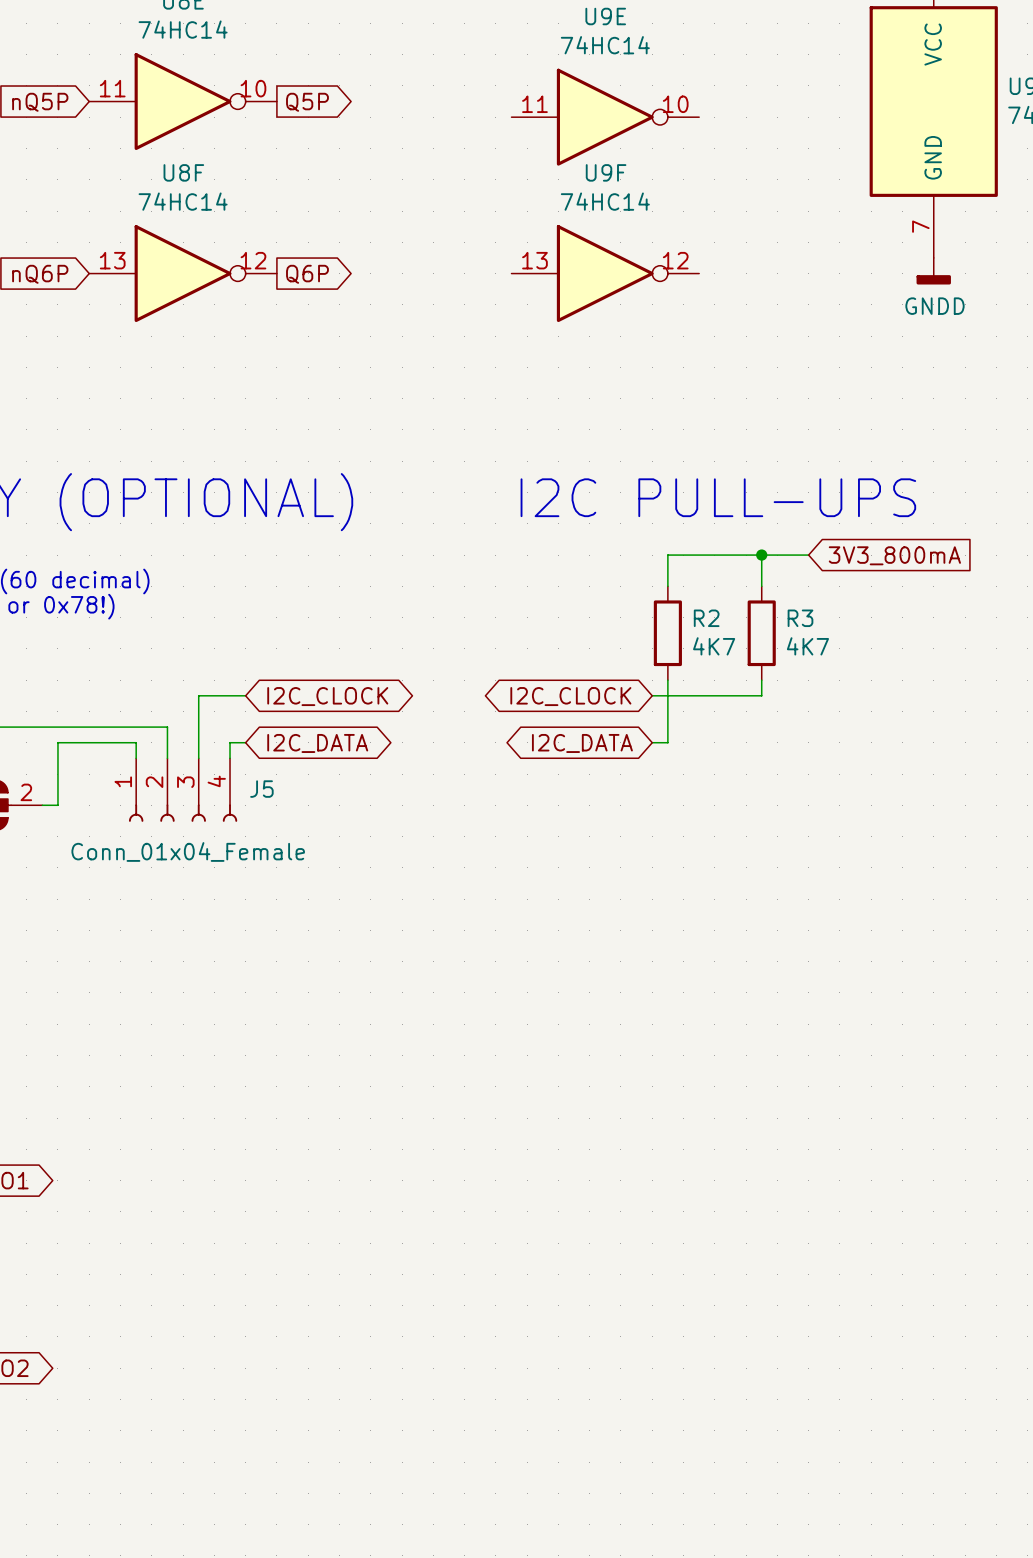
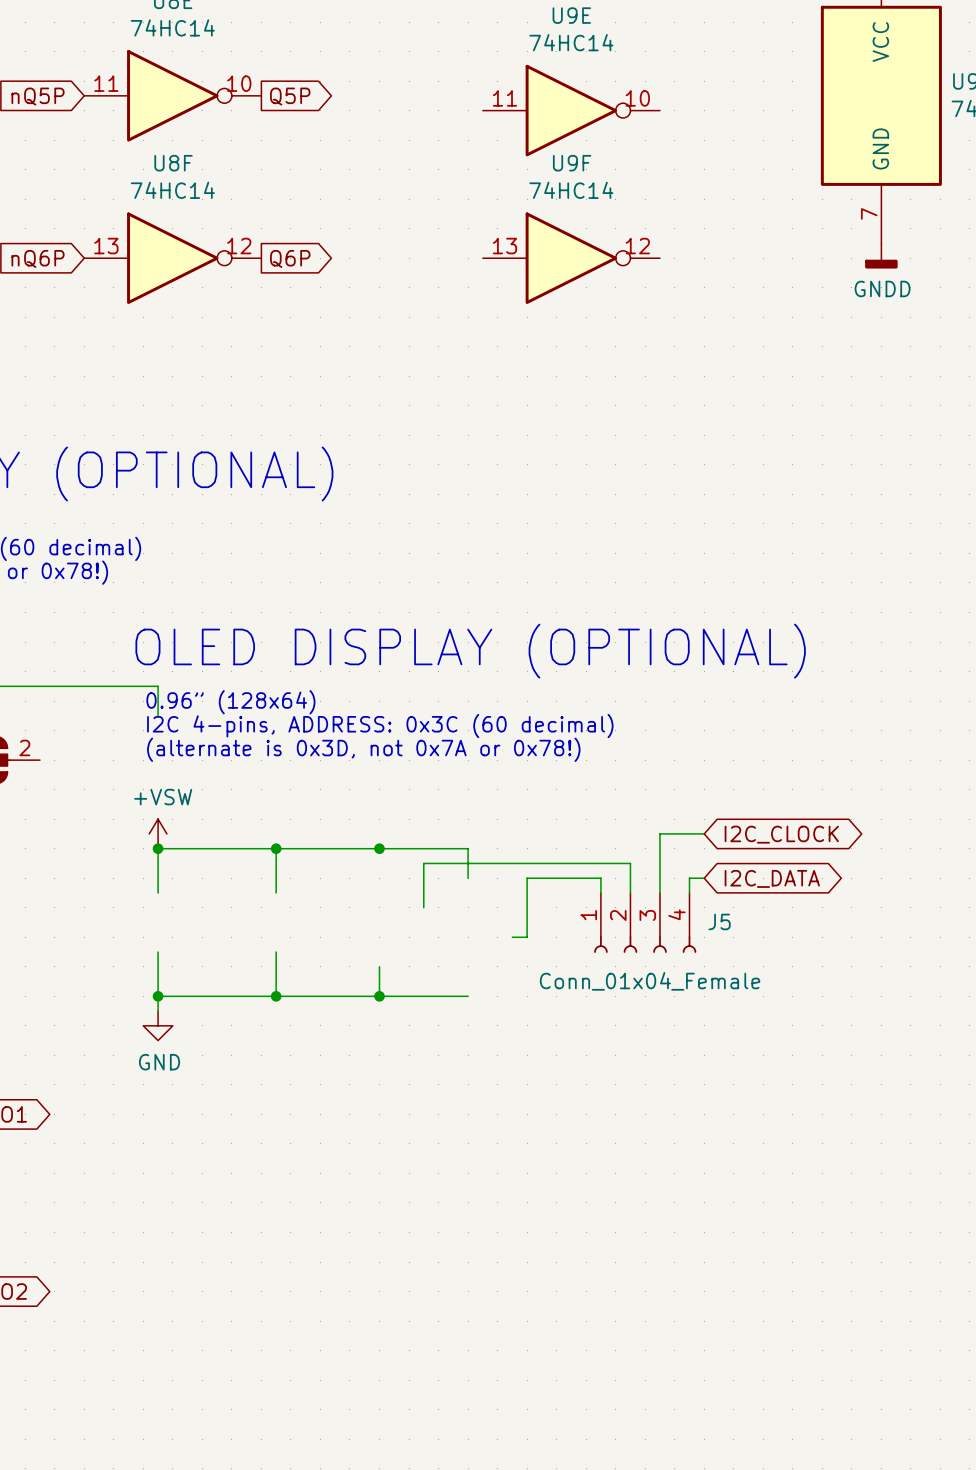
text: I2C PULL-UPS (718, 497) -> none
wire: (761, 555) (761, 586) -> none
junction: (761, 555) -> none
wire: (808, 555) (667, 555) (667, 586) -> none
global label: 3V3_800mA (894, 555) -> none
R2: 4K7 (667, 633) -> none
R3: 4K7 (761, 633) -> none
wire: (667, 680) (667, 742) (652, 742) -> none
wire: (761, 680) (761, 695) (652, 695) -> none
text: none -> OLED DISPLAY (OPTIONAL) (470, 651)
wire: (245, 695) (198, 695) (198, 758) -> none
global label: I2C_CLOCK (327, 696) -> none
global label rotation: 0° (570, 696) -> 180° (781, 834)
global label position: I2C_CLOCK (570, 696) -> I2C_CLOCK (781, 834)
wire: (245, 742) (230, 742) (230, 758) -> none
text: none -> 0.96” (128x64) (230, 702)
global label: I2C_DATA (317, 743) -> none
global label rotation: 0° (582, 743) -> 180° (772, 878)
global label position: I2C_DATA (582, 743) -> I2C_DATA (772, 878)
wire: (136, 758) (136, 742) (57, 742) (57, 805) (42, 805) -> none
text: none -> I2C 4-pins, ADDRESS: 0x3C (60 decimal) (380, 726)
J5 position: (183, 790) -> (645, 922)
text: none -> (alternate is 0x3D, not 0x7A or 0x78!) (363, 749)
power symbol: none -> +VSW (158, 833)
wire: none -> (704, 833) (659, 833) (659, 892)
junction: none -> (158, 848)
wire: none -> (276, 848) (276, 892)
junction: none -> (276, 848)
junction: none -> (379, 848)
wire: none -> (468, 878) (468, 848) (158, 848) (158, 892)
wire: none -> (704, 878) (689, 878) (689, 892)
wire: none -> (600, 892) (600, 878) (527, 878) (527, 937) (512, 937)
wire: none -> (630, 892) (630, 863) (423, 863) (423, 907)
wire: none -> (158, 952) (158, 1011)
wire: none -> (276, 952) (276, 996)
wire: none -> (379, 966) (379, 996)
wire: none -> (158, 996) (468, 996)
junction: none -> (158, 996)
junction: none -> (276, 996)
junction: none -> (379, 996)
power symbol: none -> GND (158, 1025)

